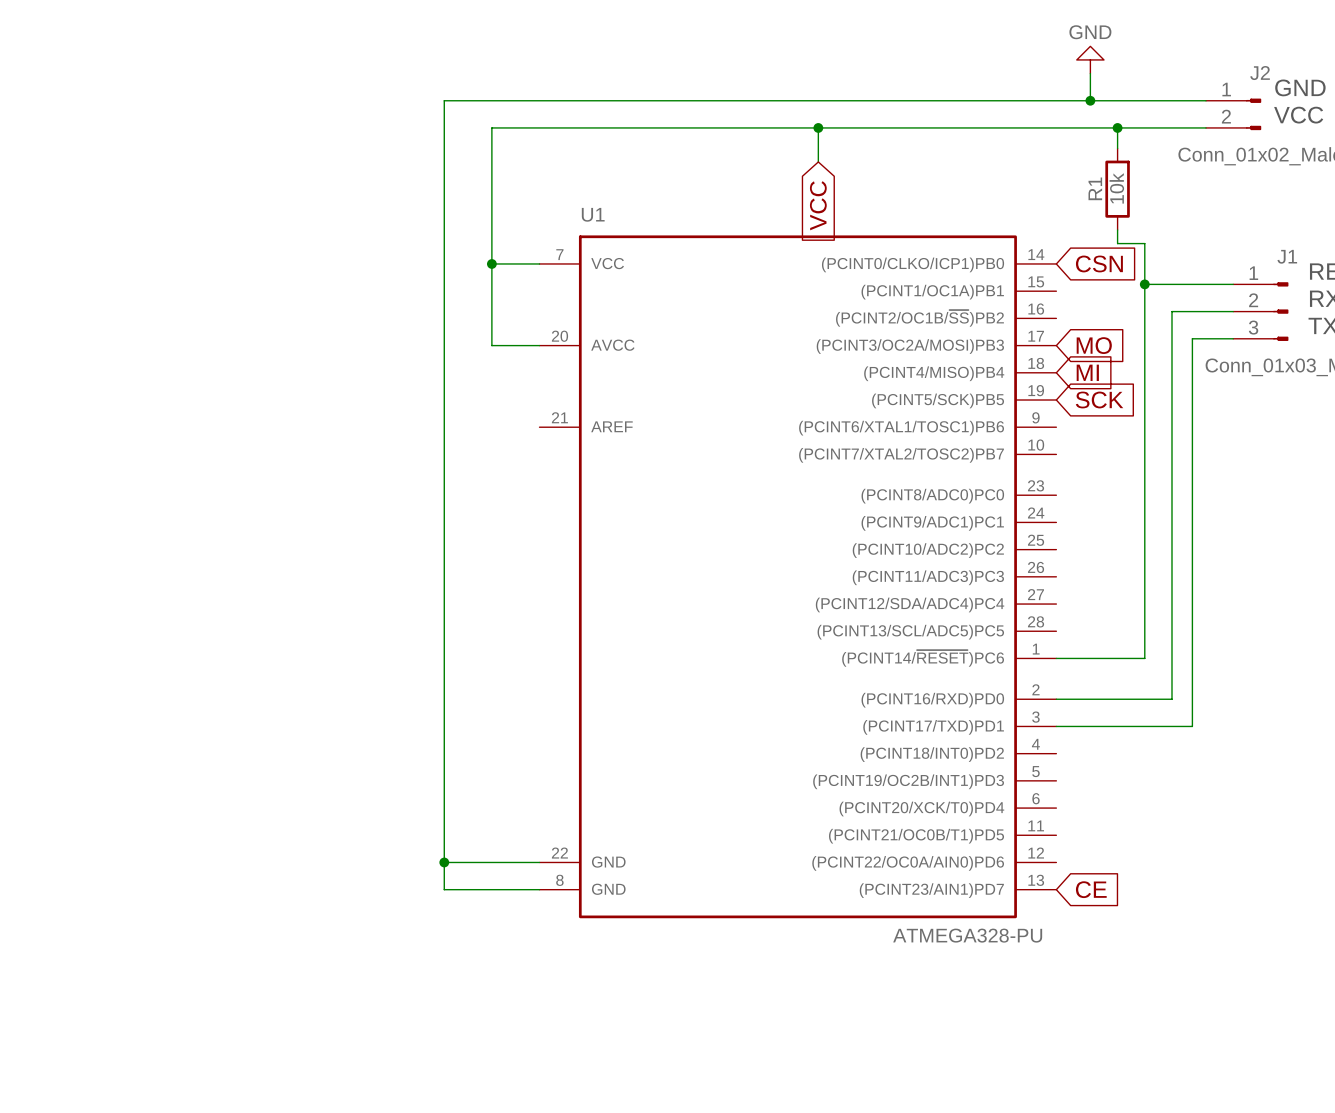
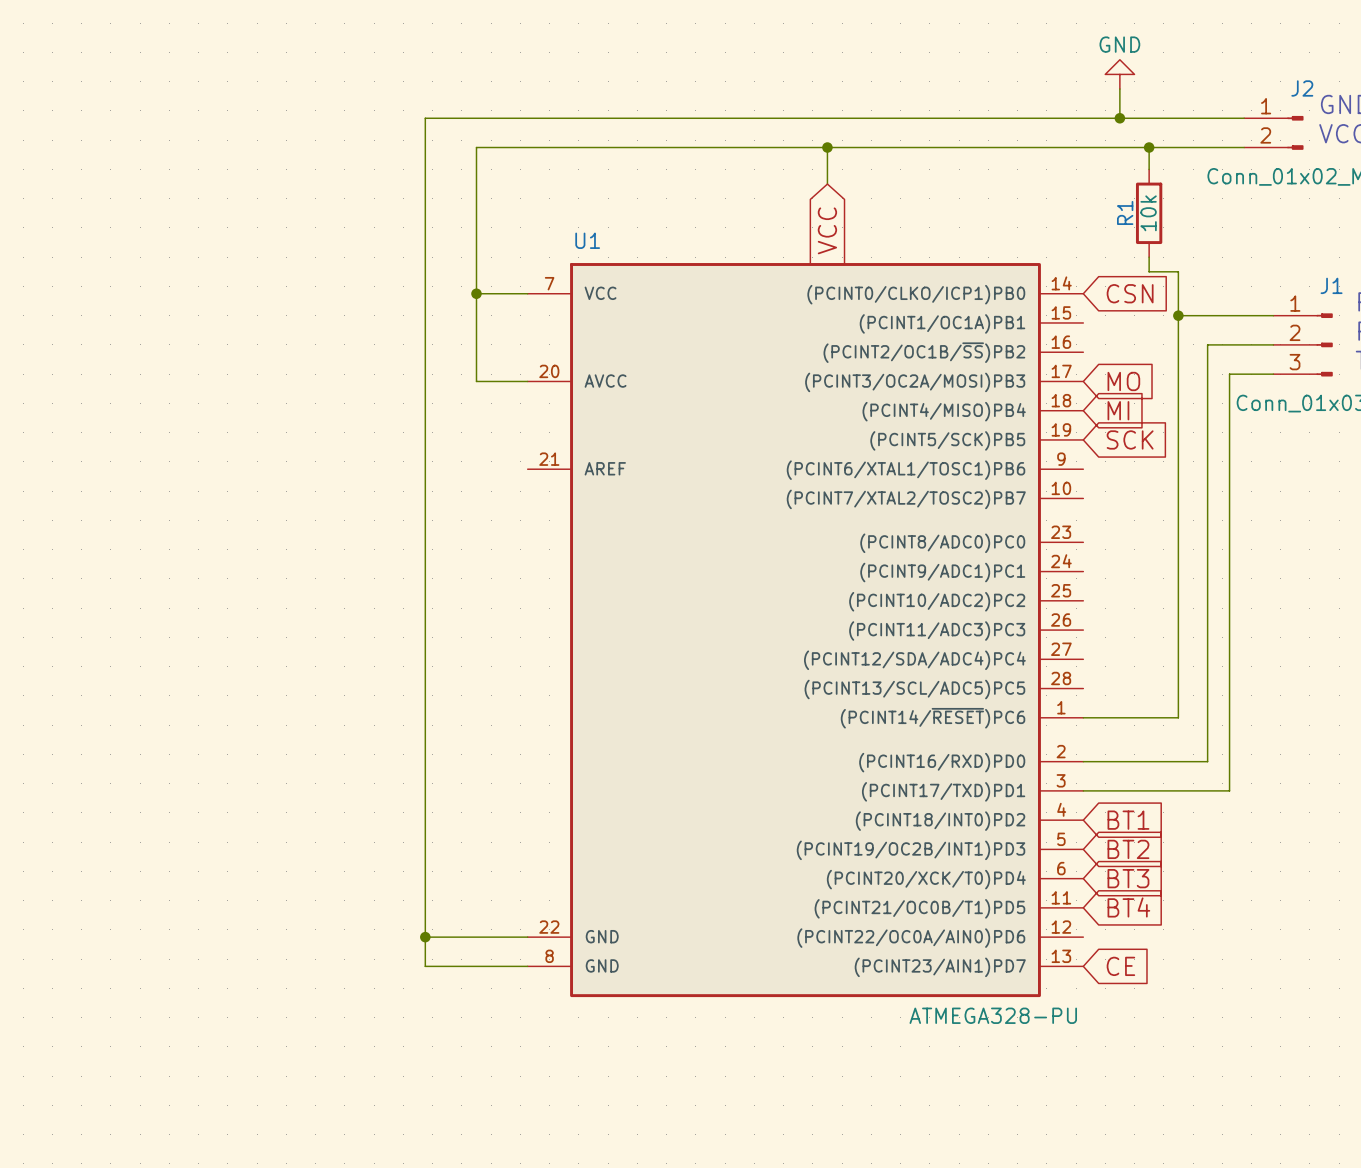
global label: none -> BT1 (1128, 820)
global label: none -> BT2 (1128, 849)
global label: none -> BT3 (1128, 878)
global label: none -> BT4 (1128, 907)

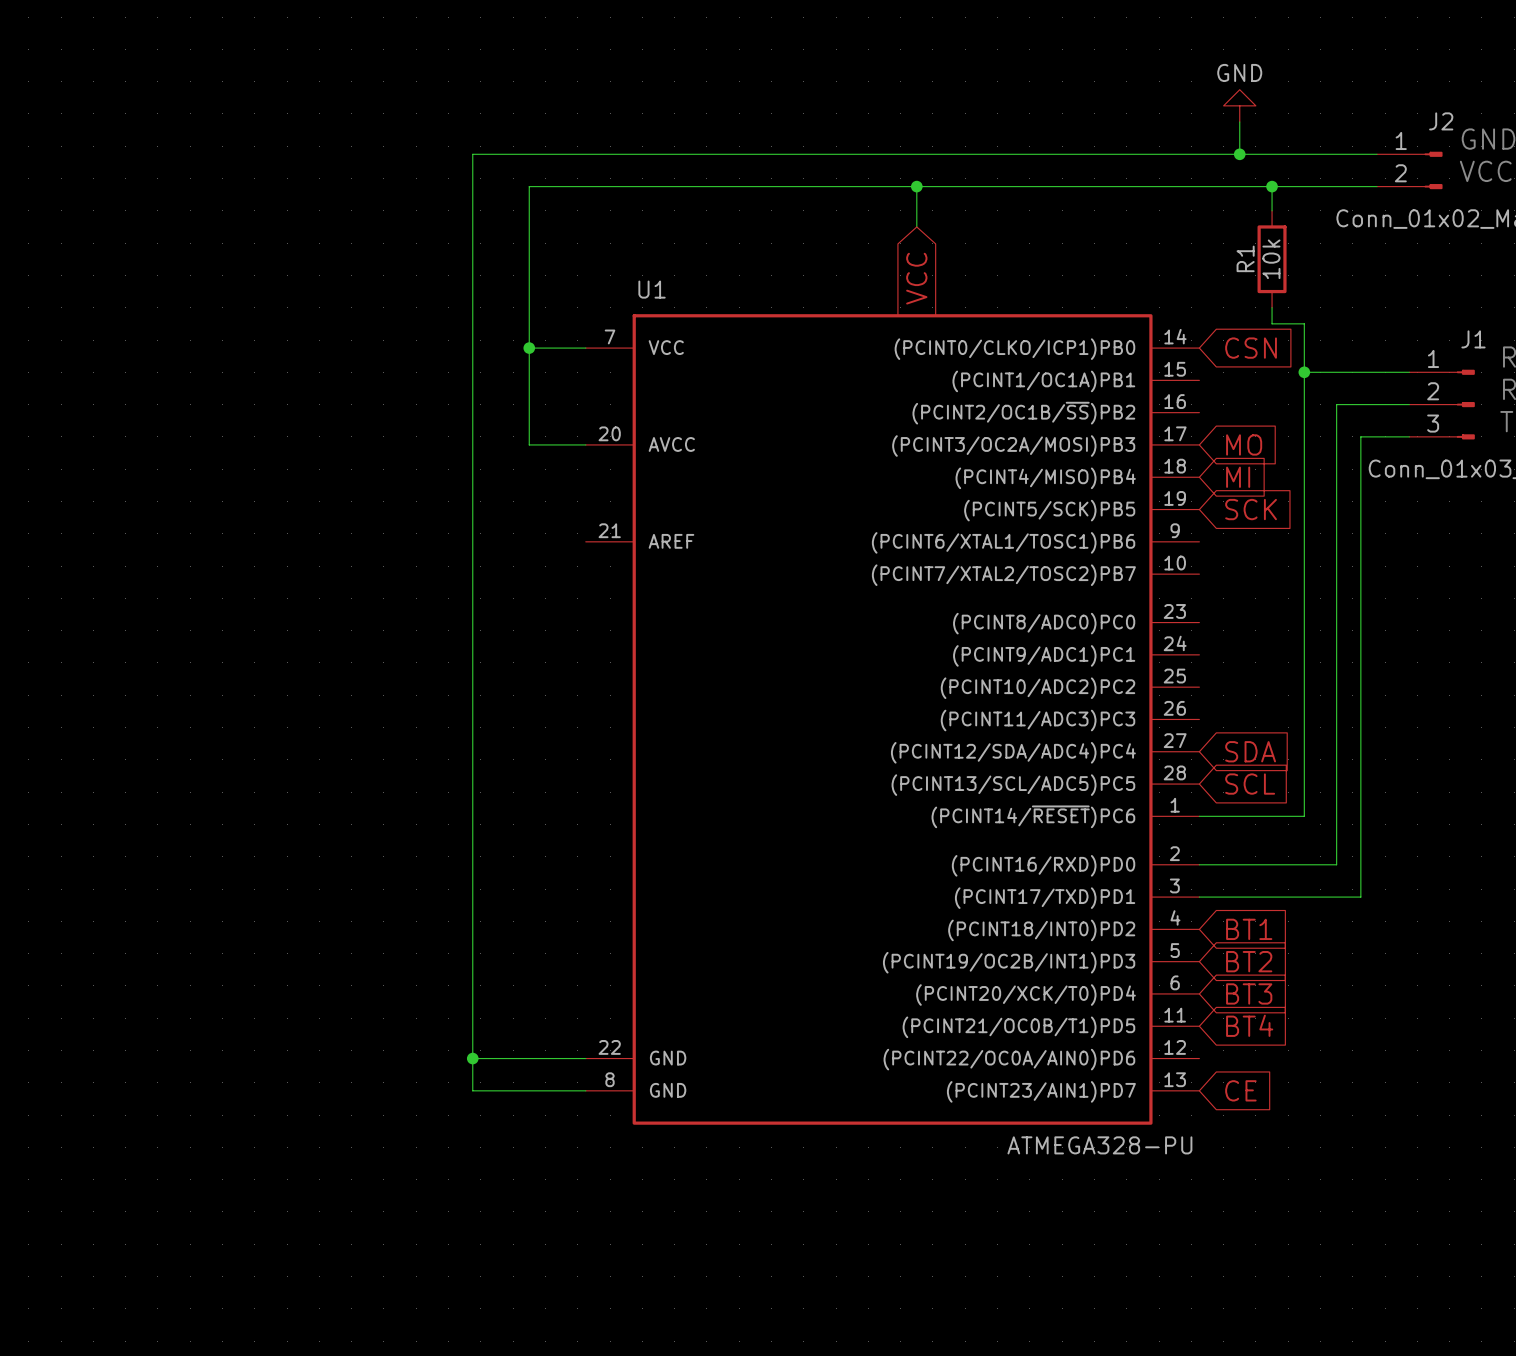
global label: none -> SDA (1250, 751)
global label: none -> SCL (1250, 784)

